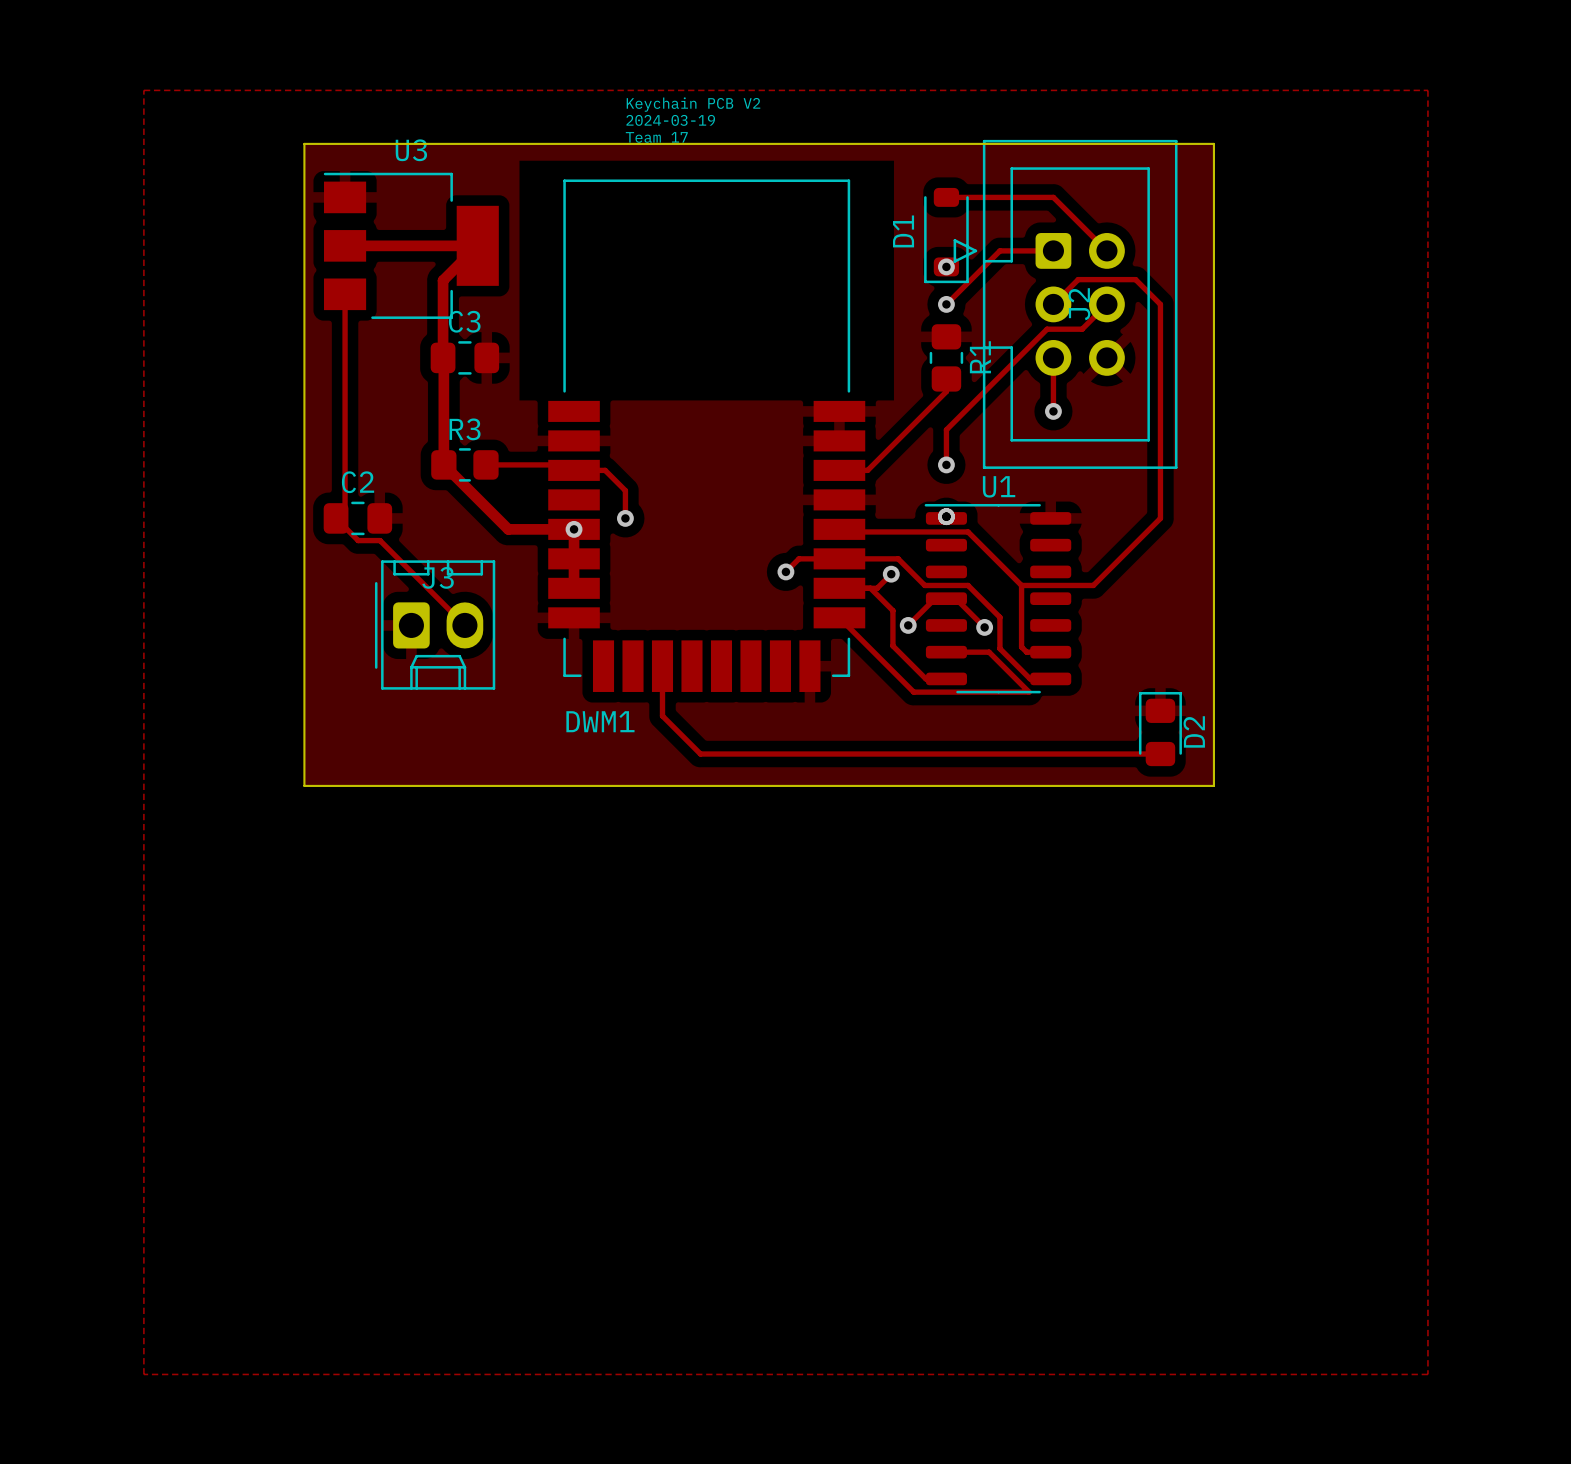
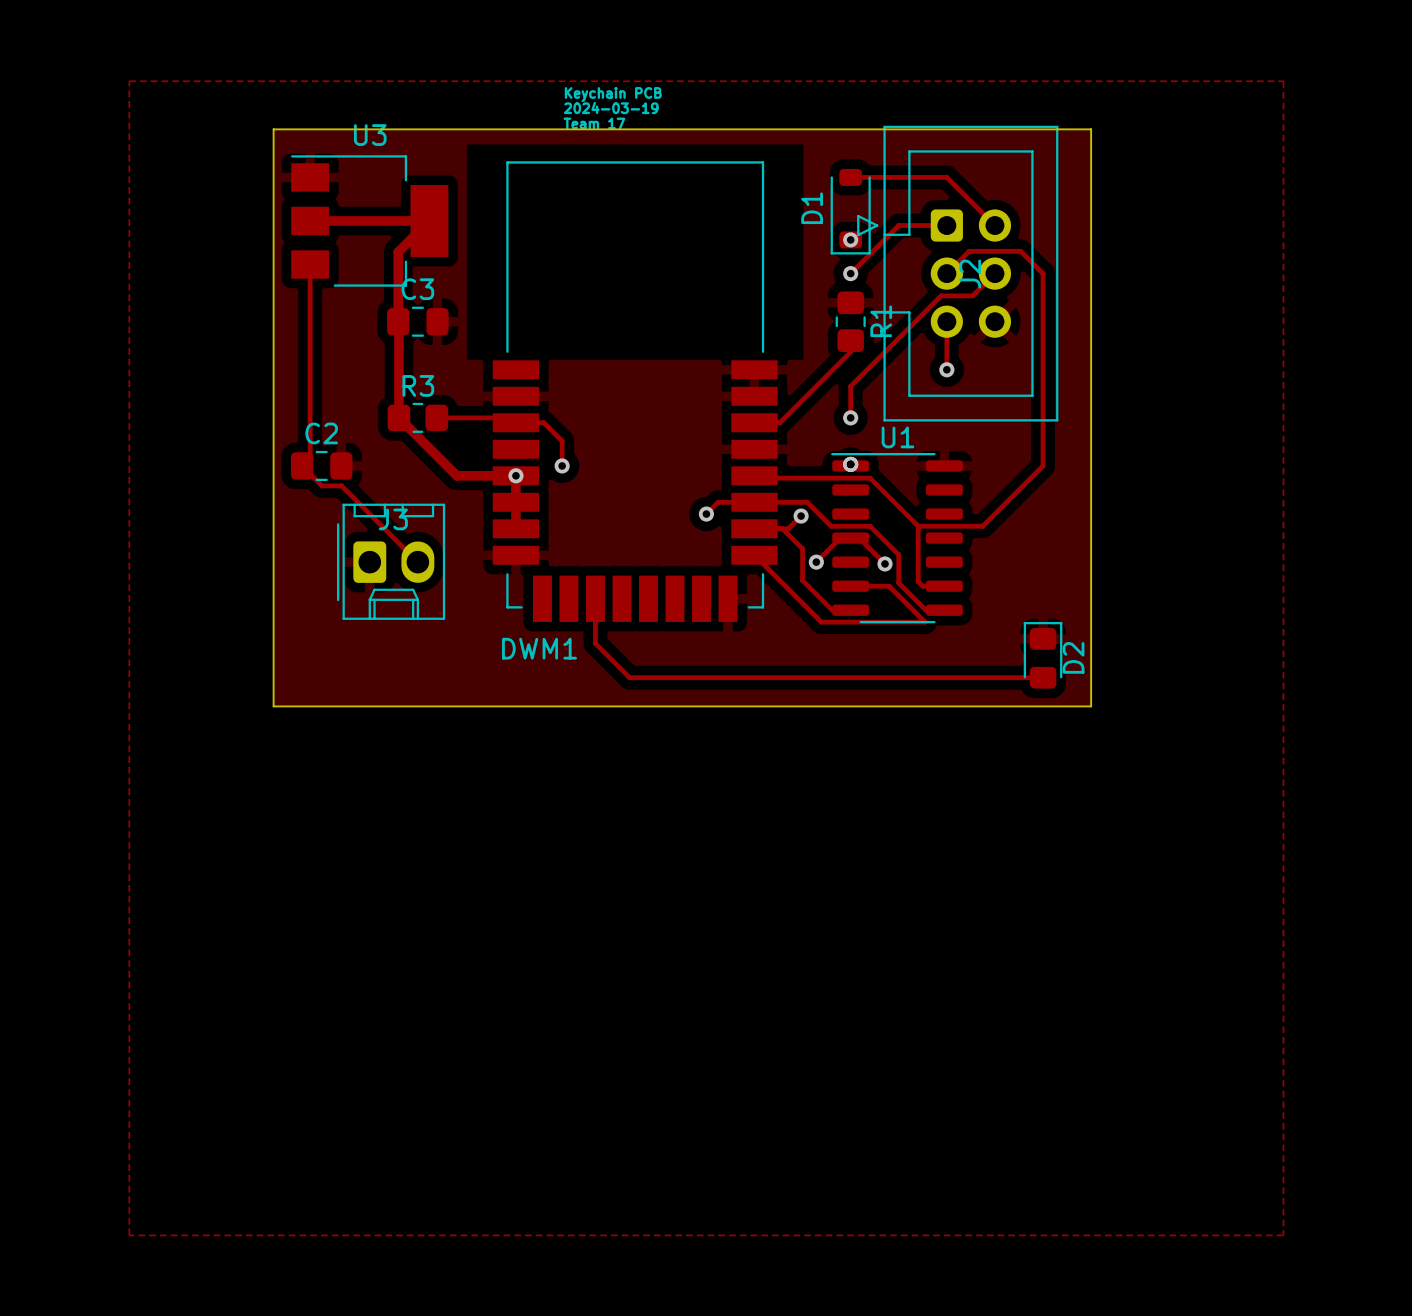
text: Keychain PCB V2 (693, 104) -> Keychain PCB (613, 94)

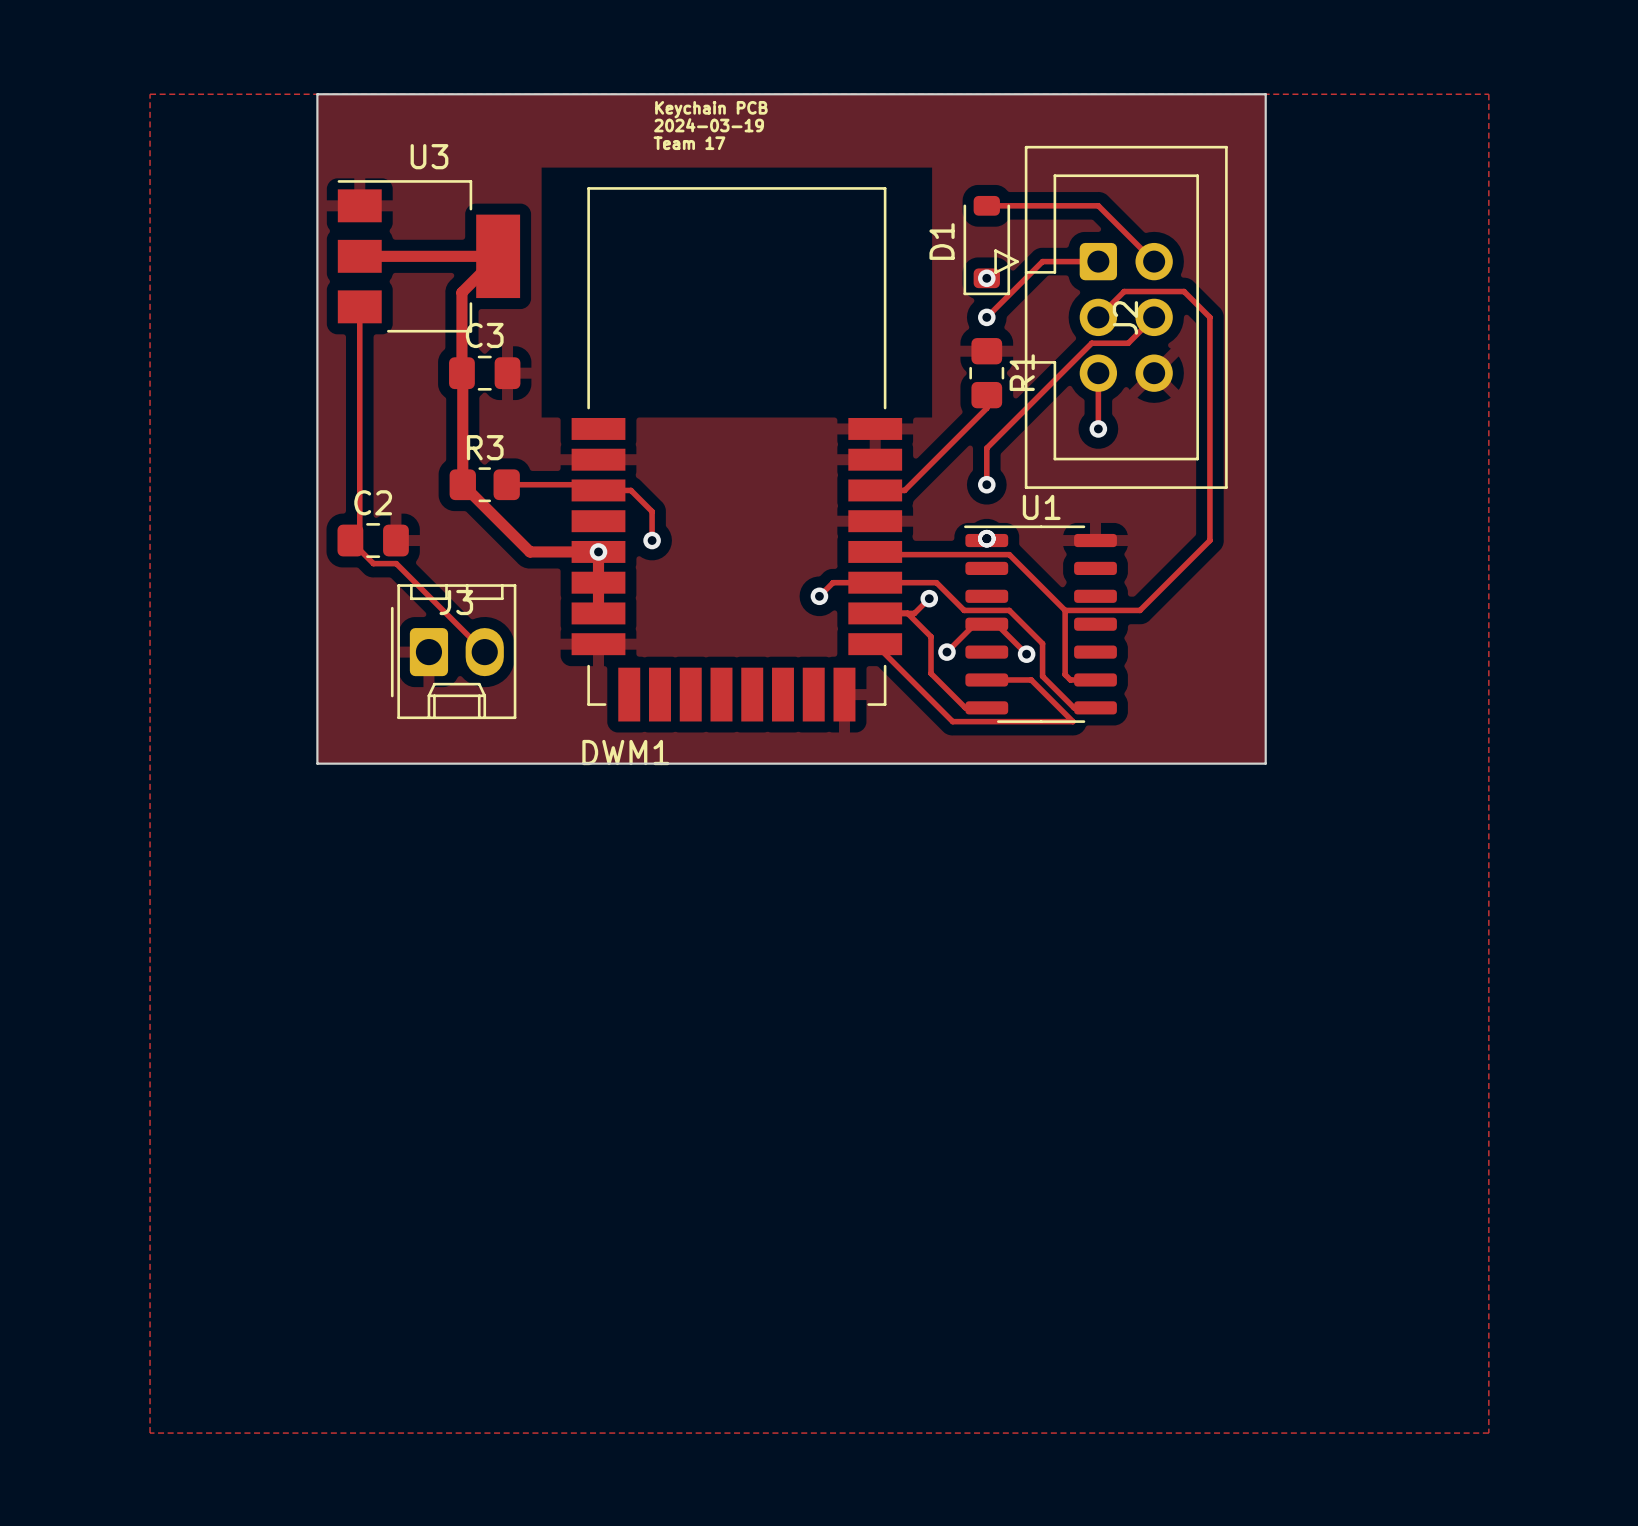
board edge: (273, 129) (1091, 129) -> (317, 150) (317, 94) (1265, 94) (1265, 150)
track: (595, 598) (595, 643) (629, 677) (1043, 677) -> none
D2: (1043, 655) -> none
board edge: (273, 658) (273, 706) (1091, 706) (1091, 658) -> (317, 763) (1265, 763)

